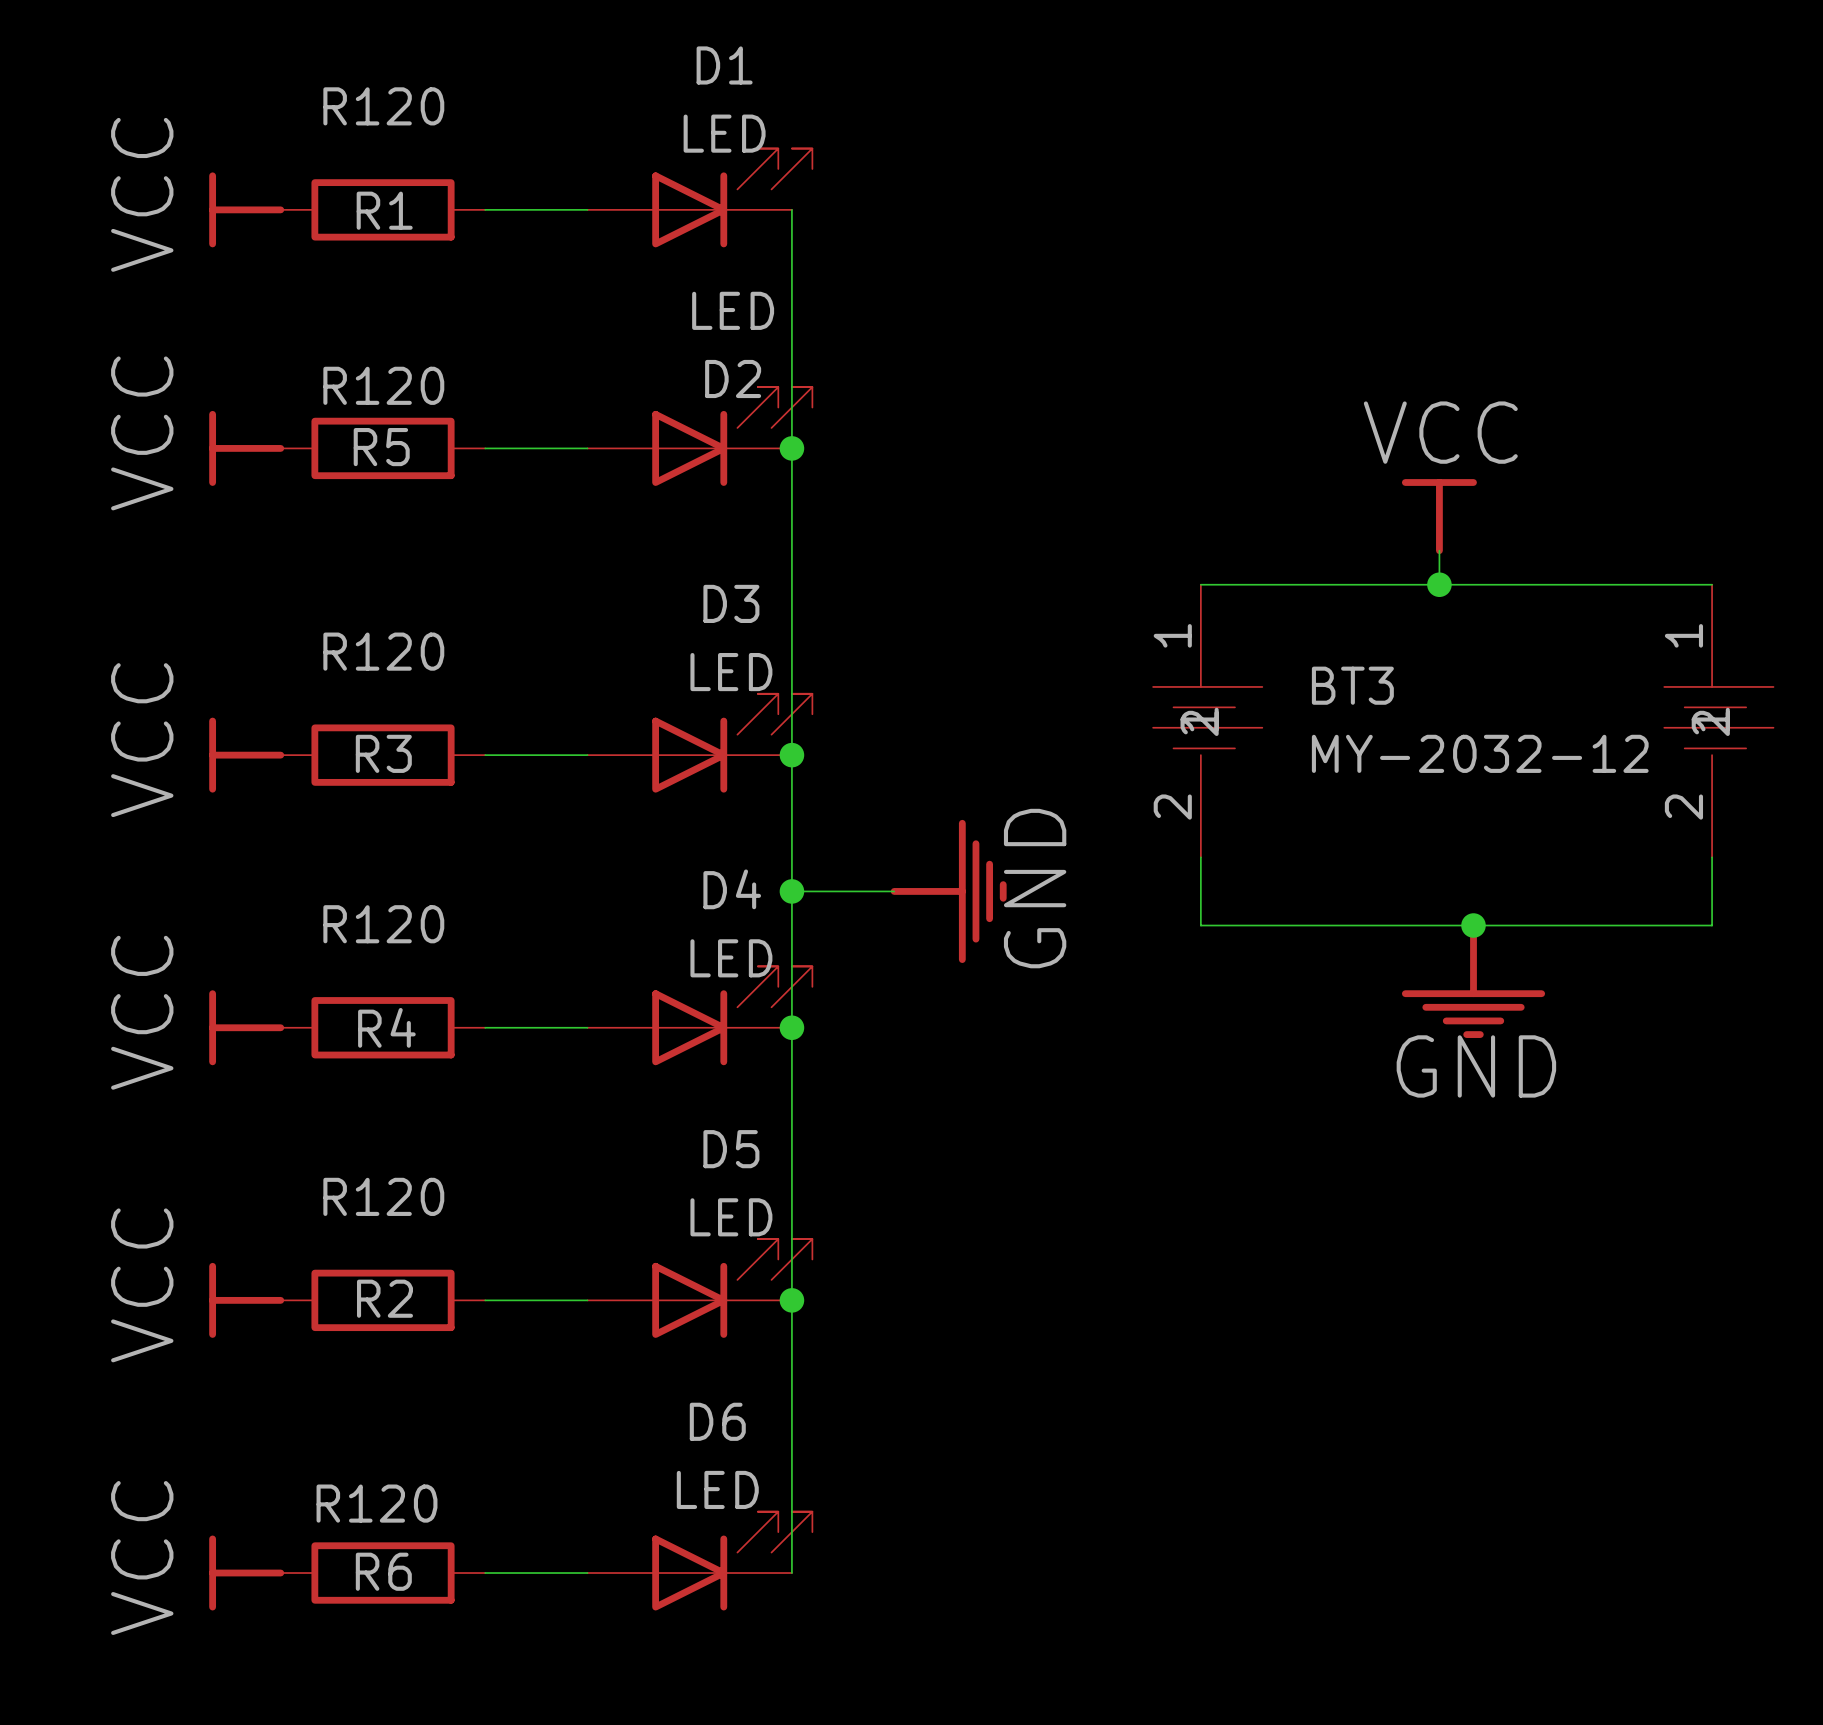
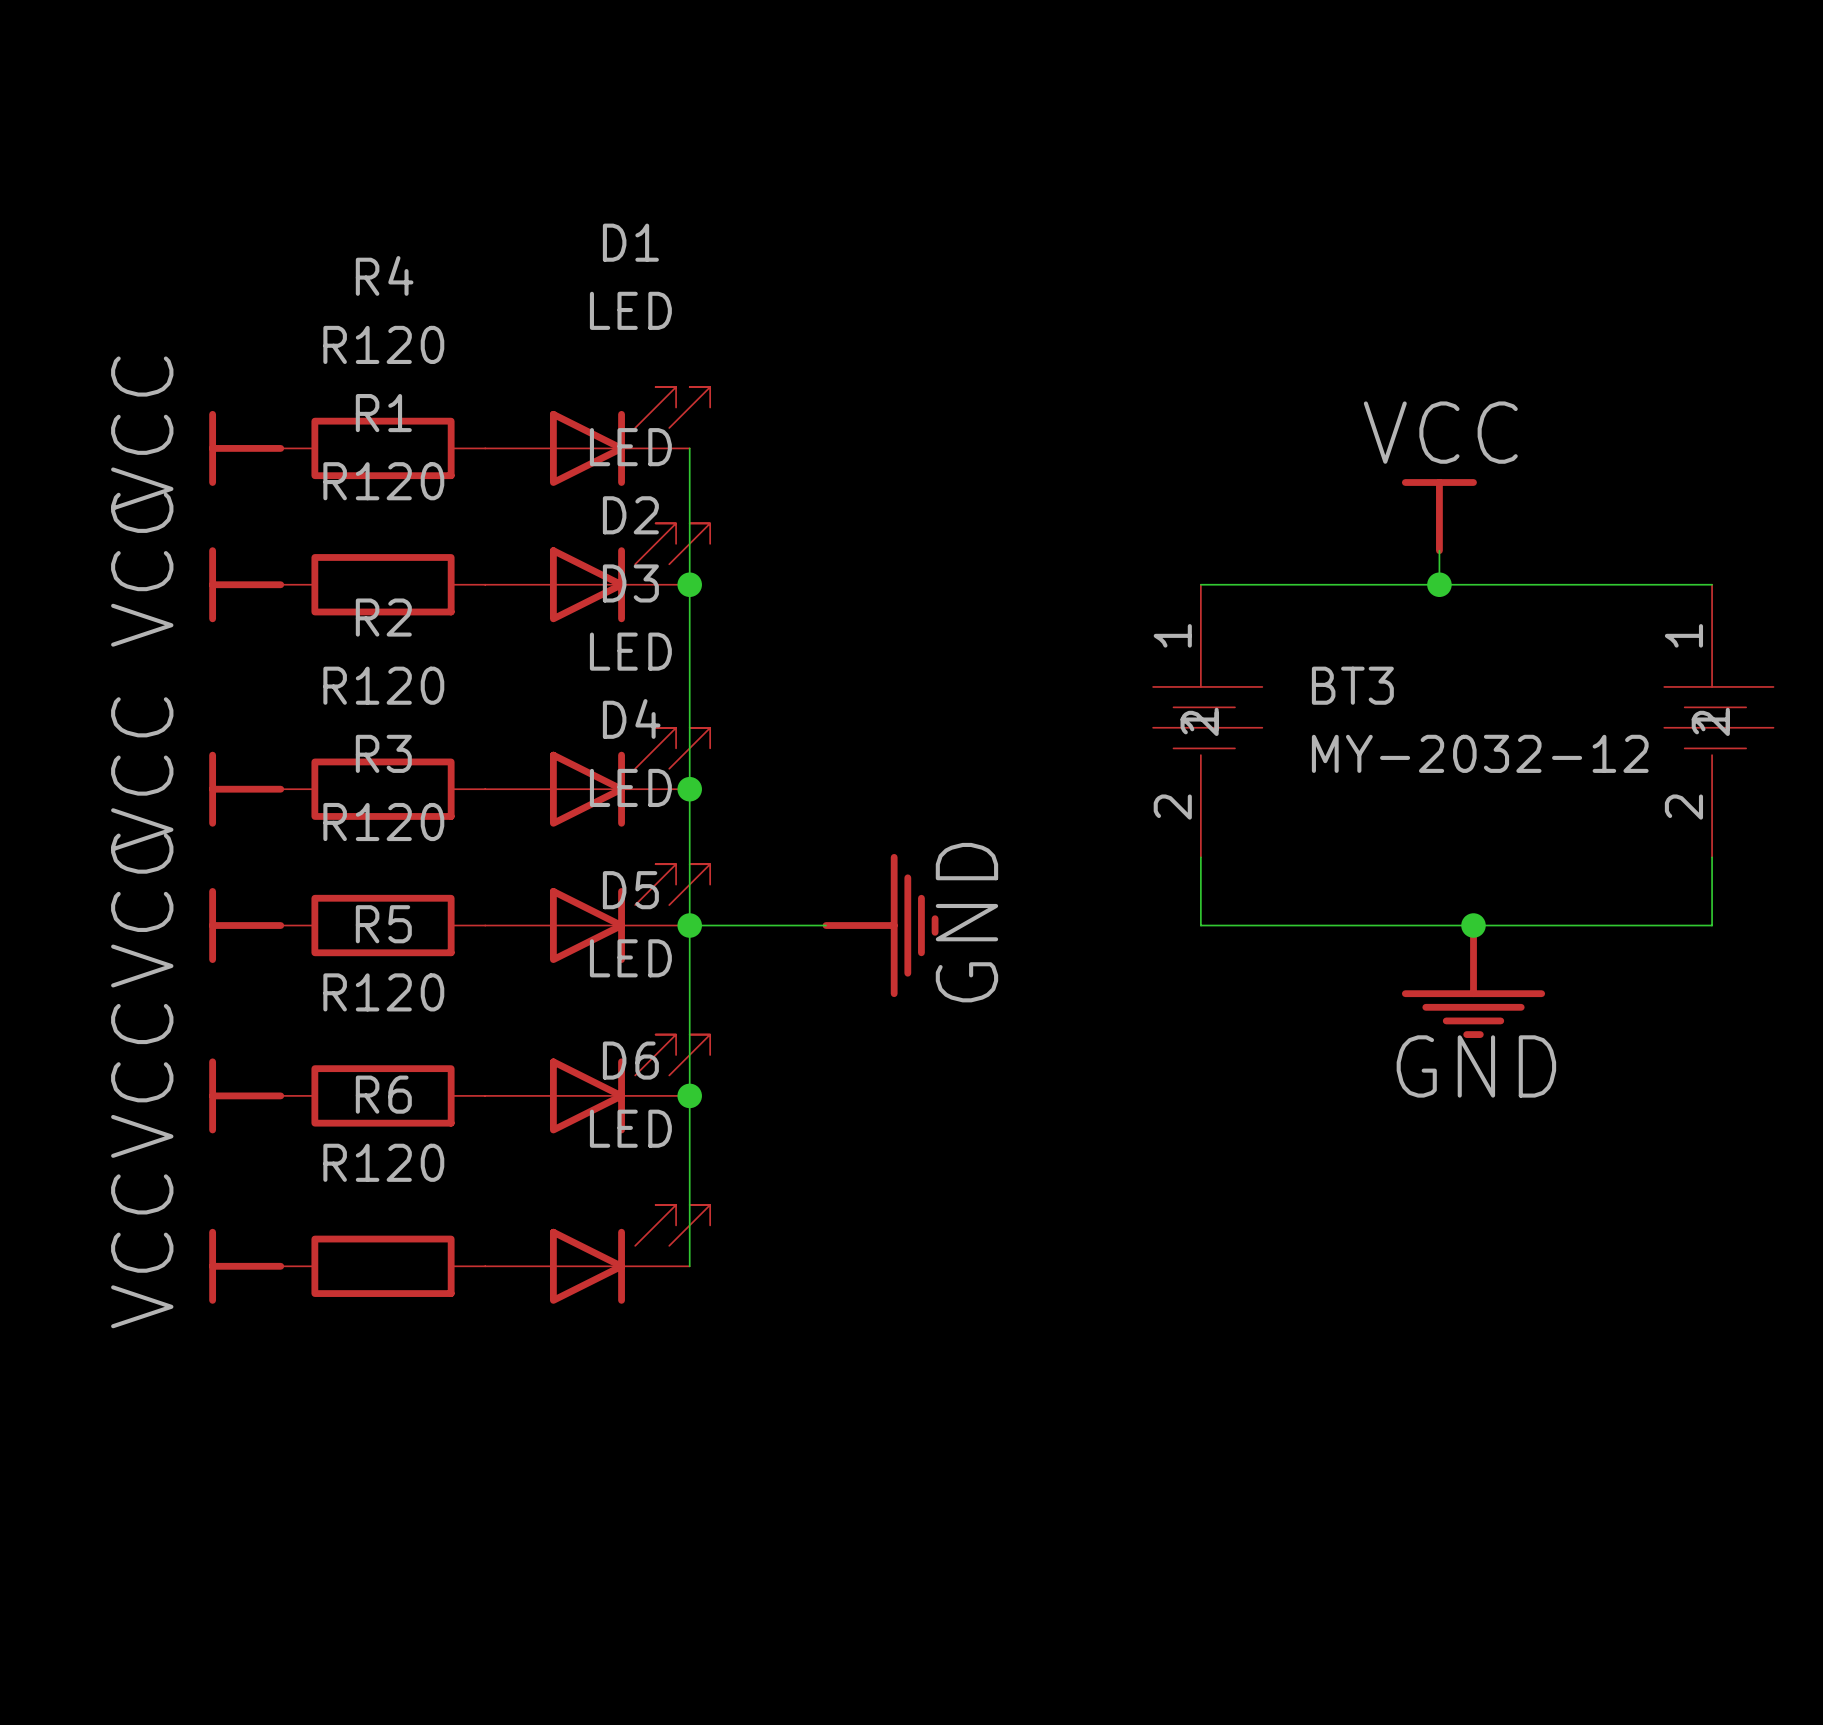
D1 name position: D1 (724, 65) -> D1 (630, 242)
D1 value position: LED (724, 133) -> LED (630, 310)
D1 position: (699, 197) -> (597, 436)
power symbol: VCC (246, 209) -> none
R1 position: (383, 209) -> (383, 584)
wire: (485, 209) (587, 209) -> none
wire: (791, 209) (791, 1573) -> none
R1 name position: R1 (384, 210) -> R1 (383, 413)
R5 value position: R120 (383, 385) -> R120 (383, 344)
D2 position: (699, 436) -> (597, 572)
R5 name: R5 (381, 447) -> R4 (384, 275)
wire: none -> (689, 448) (689, 1266)
junction: (791, 448) -> none
power symbol: none -> VCC (246, 584)
junction: none -> (689, 584)
D3 name position: D3 (731, 603) -> D3 (630, 583)
D3 value position: LED (731, 672) -> LED (630, 651)
D3 position: (699, 743) -> (597, 777)
power symbol position: VCC (246, 755) -> VCC (246, 789)
R3 position: (383, 755) -> (383, 925)
wire: (485, 755) (587, 755) -> none
junction: (791, 755) -> none
junction: none -> (689, 789)
D4 name position: D4 (732, 889) -> D4 (631, 718)
wire: (791, 891) (894, 891) -> none
junction: (791, 891) -> none
power symbol position: GND (948, 891) -> GND (880, 925)
power symbol: none -> VCC (246, 925)
wire: none -> (689, 925) (826, 925)
junction: none -> (689, 925)
D4 value position: LED (731, 958) -> LED (630, 787)
D4 position: (699, 1015) -> (597, 913)
power symbol: VCC (246, 1027) -> none
R4: R120 (383, 1027) -> none
wire: (485, 1027) (587, 1027) -> none
junction: (791, 1027) -> none
power symbol: none -> VCC (246, 1095)
R5: none -> R120 (383, 1095)
junction: none -> (689, 1095)
D5 name position: D5 (731, 1149) -> D5 (630, 890)
D5 value position: LED (731, 1217) -> LED (630, 958)
D5 position: (699, 1288) -> (597, 1083)
R2 name position: R2 (384, 1298) -> R2 (383, 617)
power symbol position: VCC (246, 1300) -> VCC (246, 1266)
R2 position: (383, 1300) -> (383, 789)
wire: (485, 1300) (587, 1300) -> none
junction: (791, 1300) -> none
D6 name position: D6 (717, 1421) -> D6 (630, 1060)
D6 value position: LED (717, 1489) -> LED (630, 1128)
R6 value position: R120 (377, 1503) -> R120 (383, 1162)
D6 position: (699, 1561) -> (597, 1254)
R6 name position: R6 (383, 1571) -> R6 (383, 1094)
power symbol: VCC (246, 1573) -> none
R6 position: (383, 1573) -> (383, 1266)
wire: (485, 1573) (587, 1573) -> none

